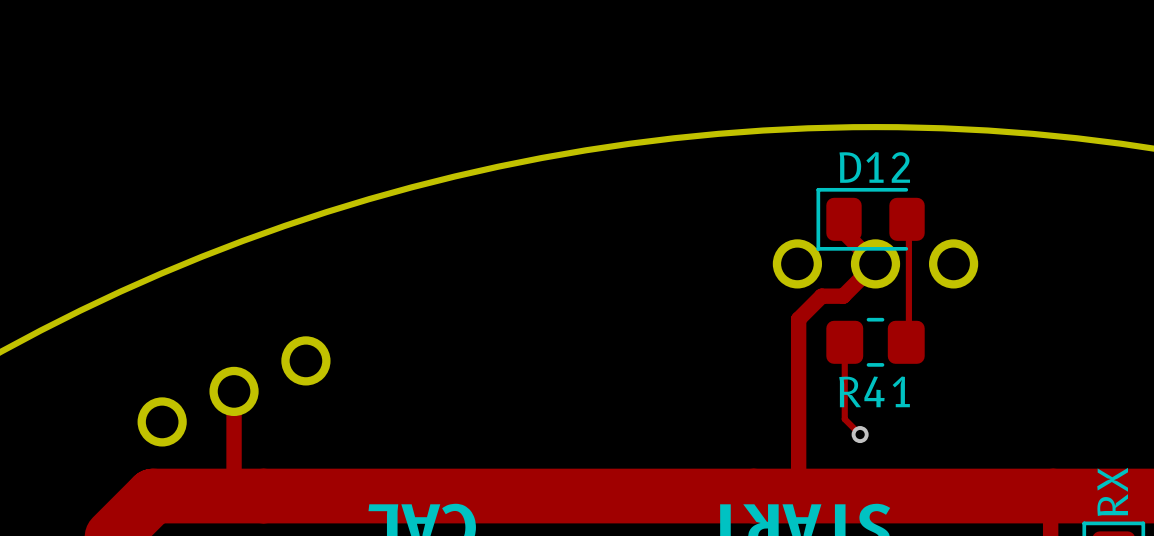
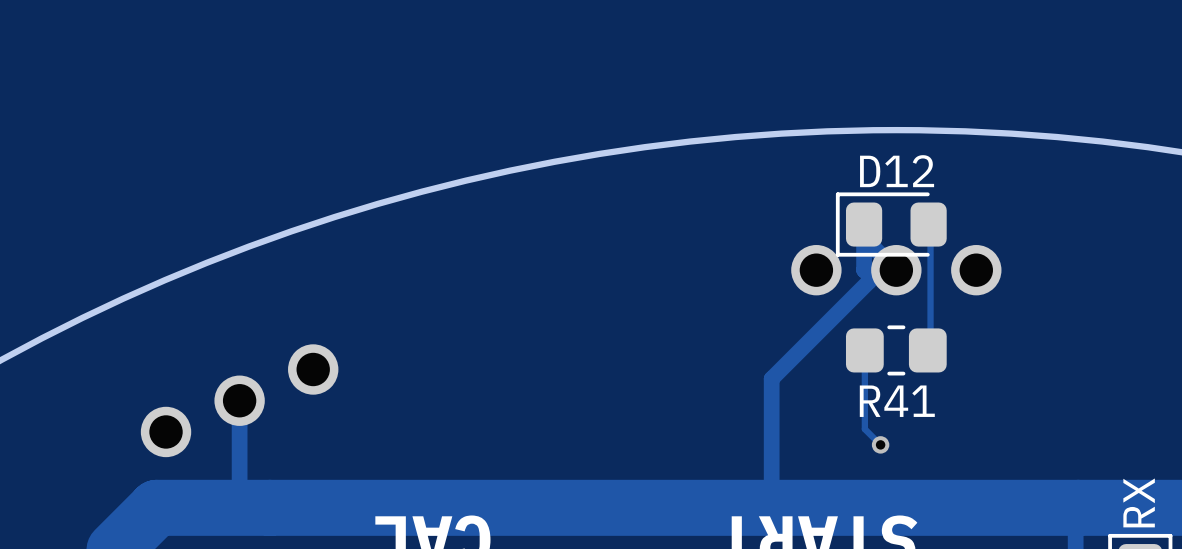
track: none -> (864, 237) (864, 270) (869, 275) (869, 281) (771, 378) (771, 507)
track: (875, 263) (843, 296) (821, 296) (798, 319) (798, 496) -> none

